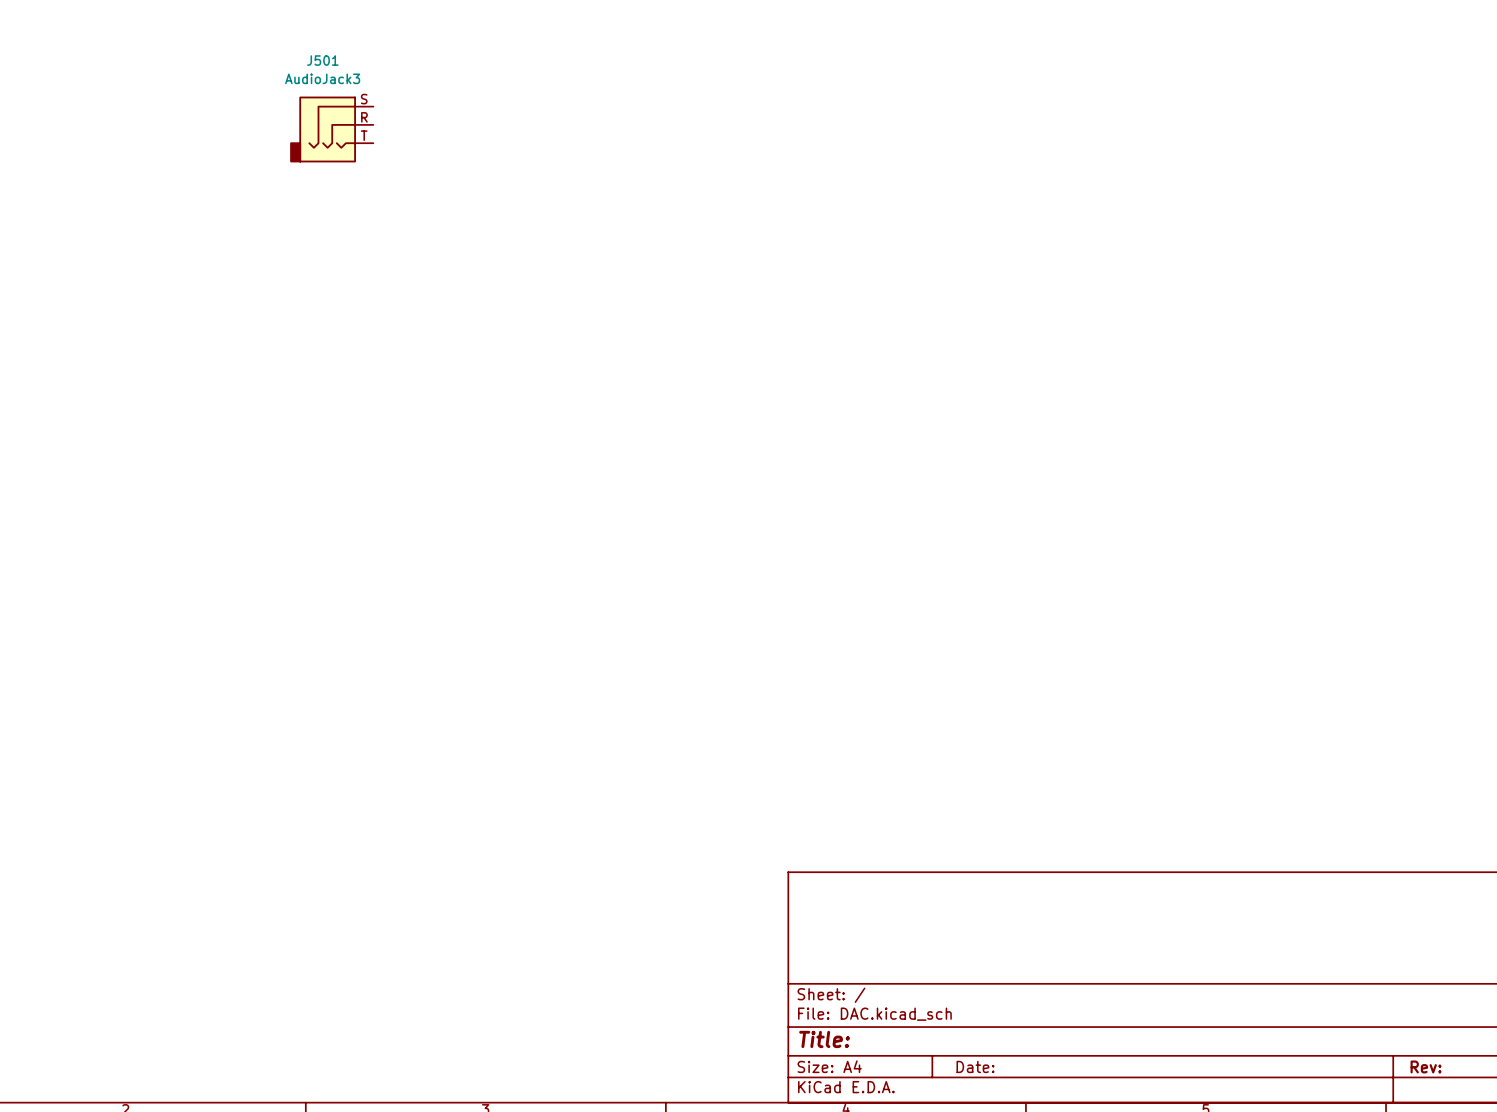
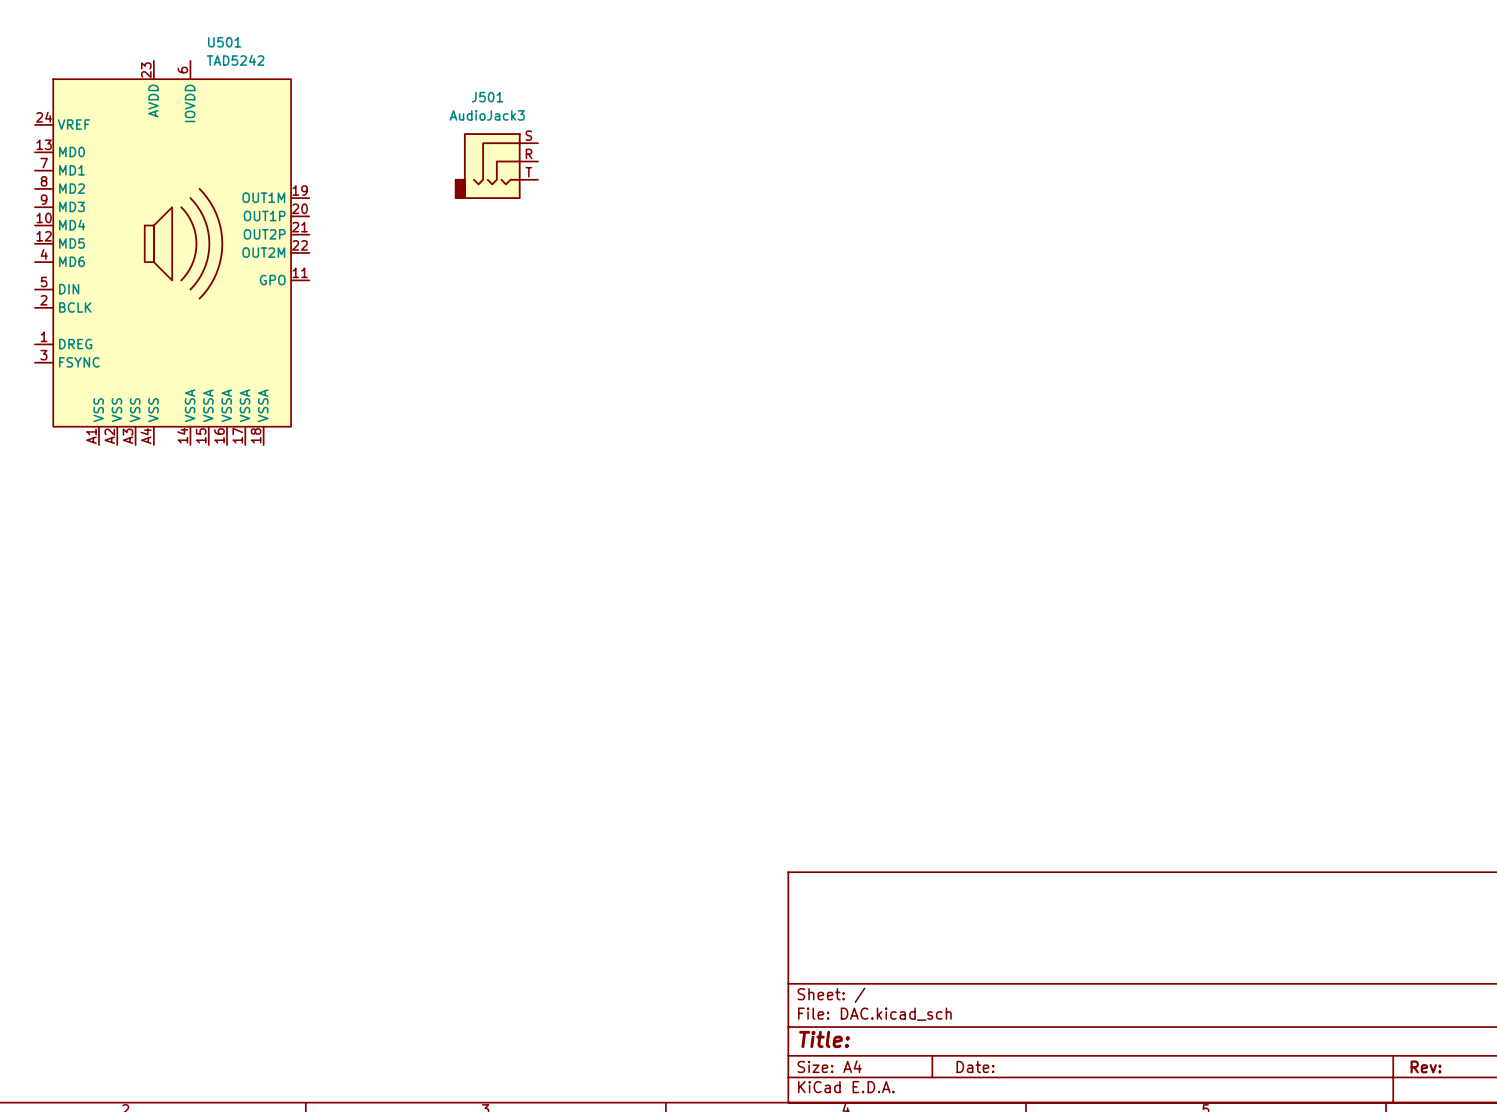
J501 position: (331, 129) -> (496, 166)
U501: none -> TAD5242 (172, 252)

